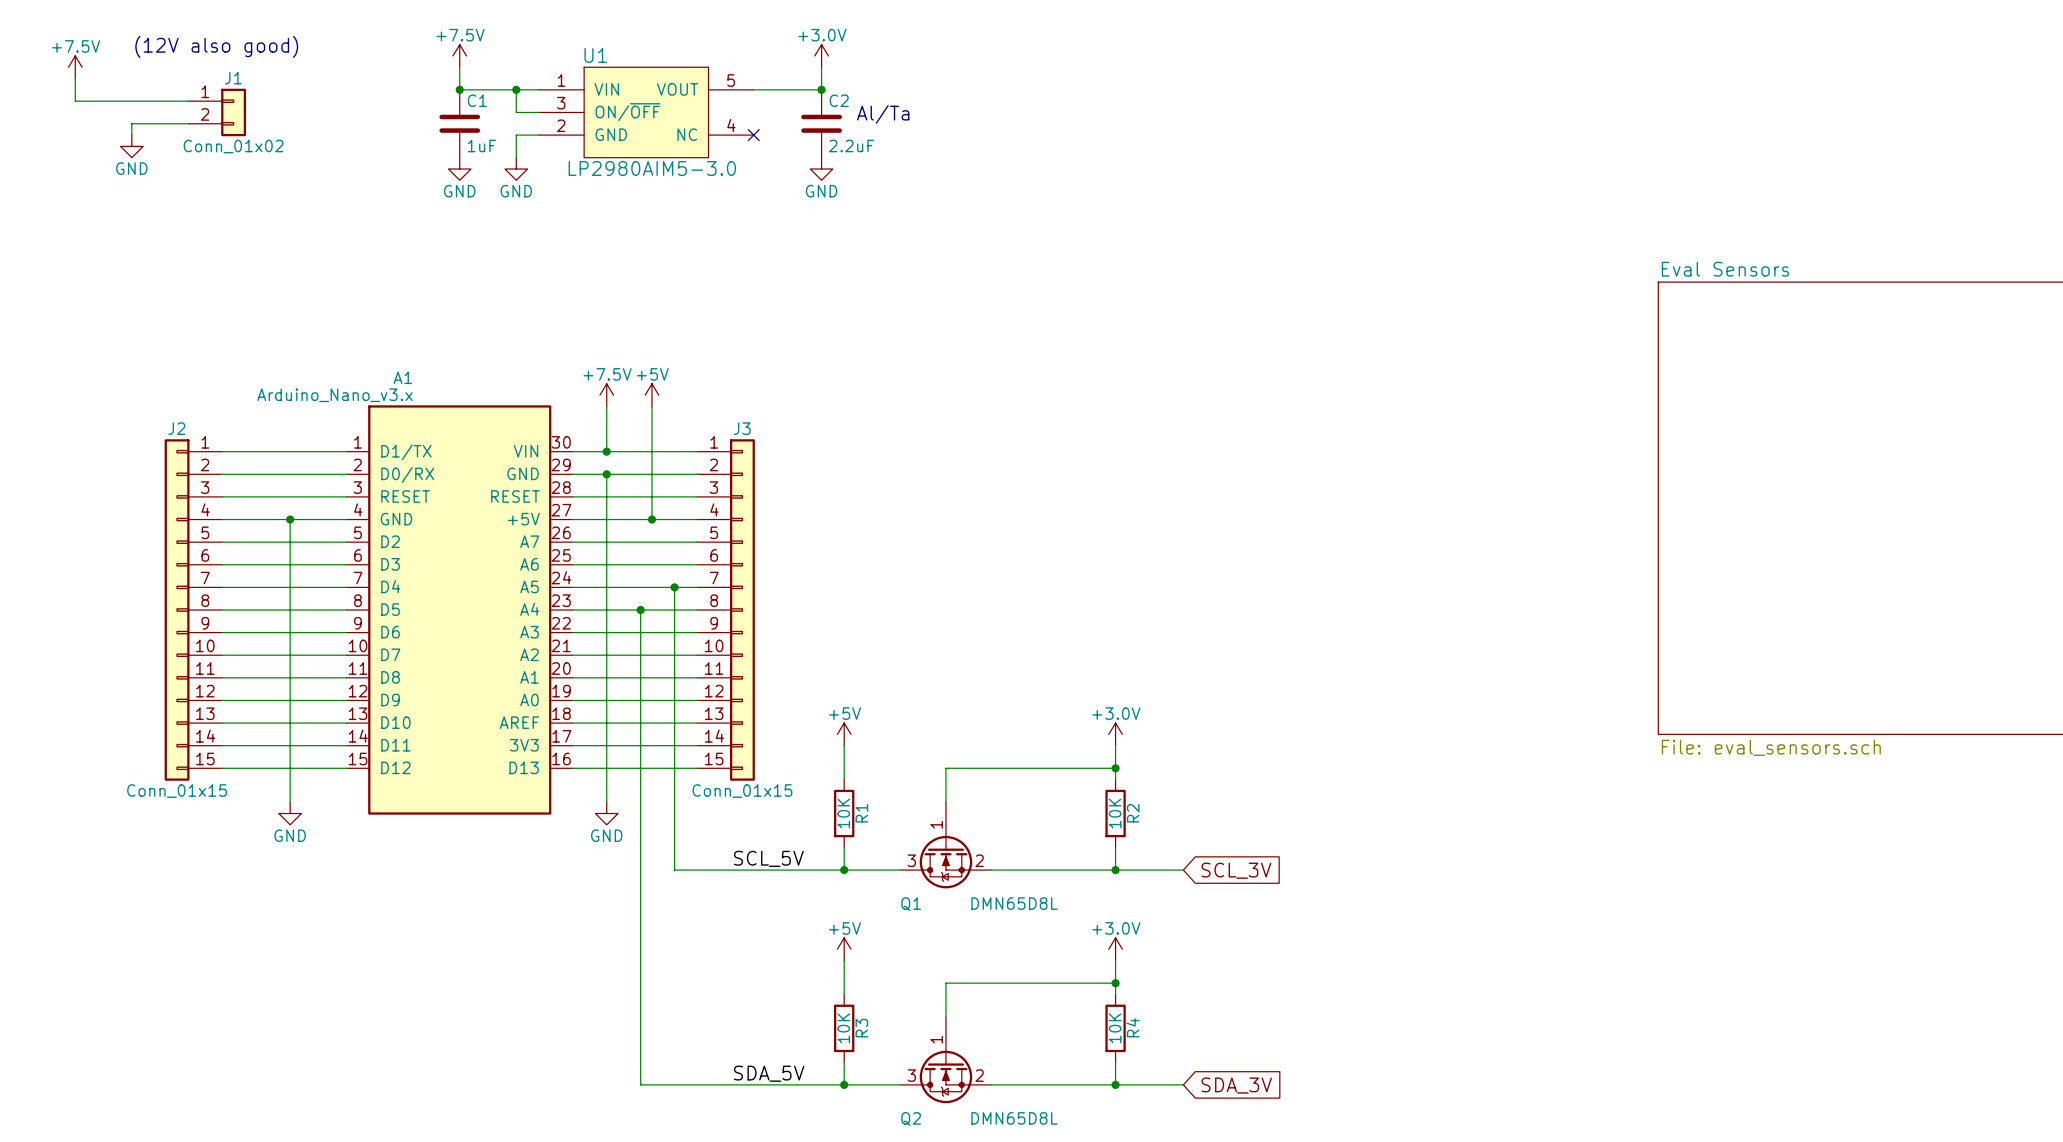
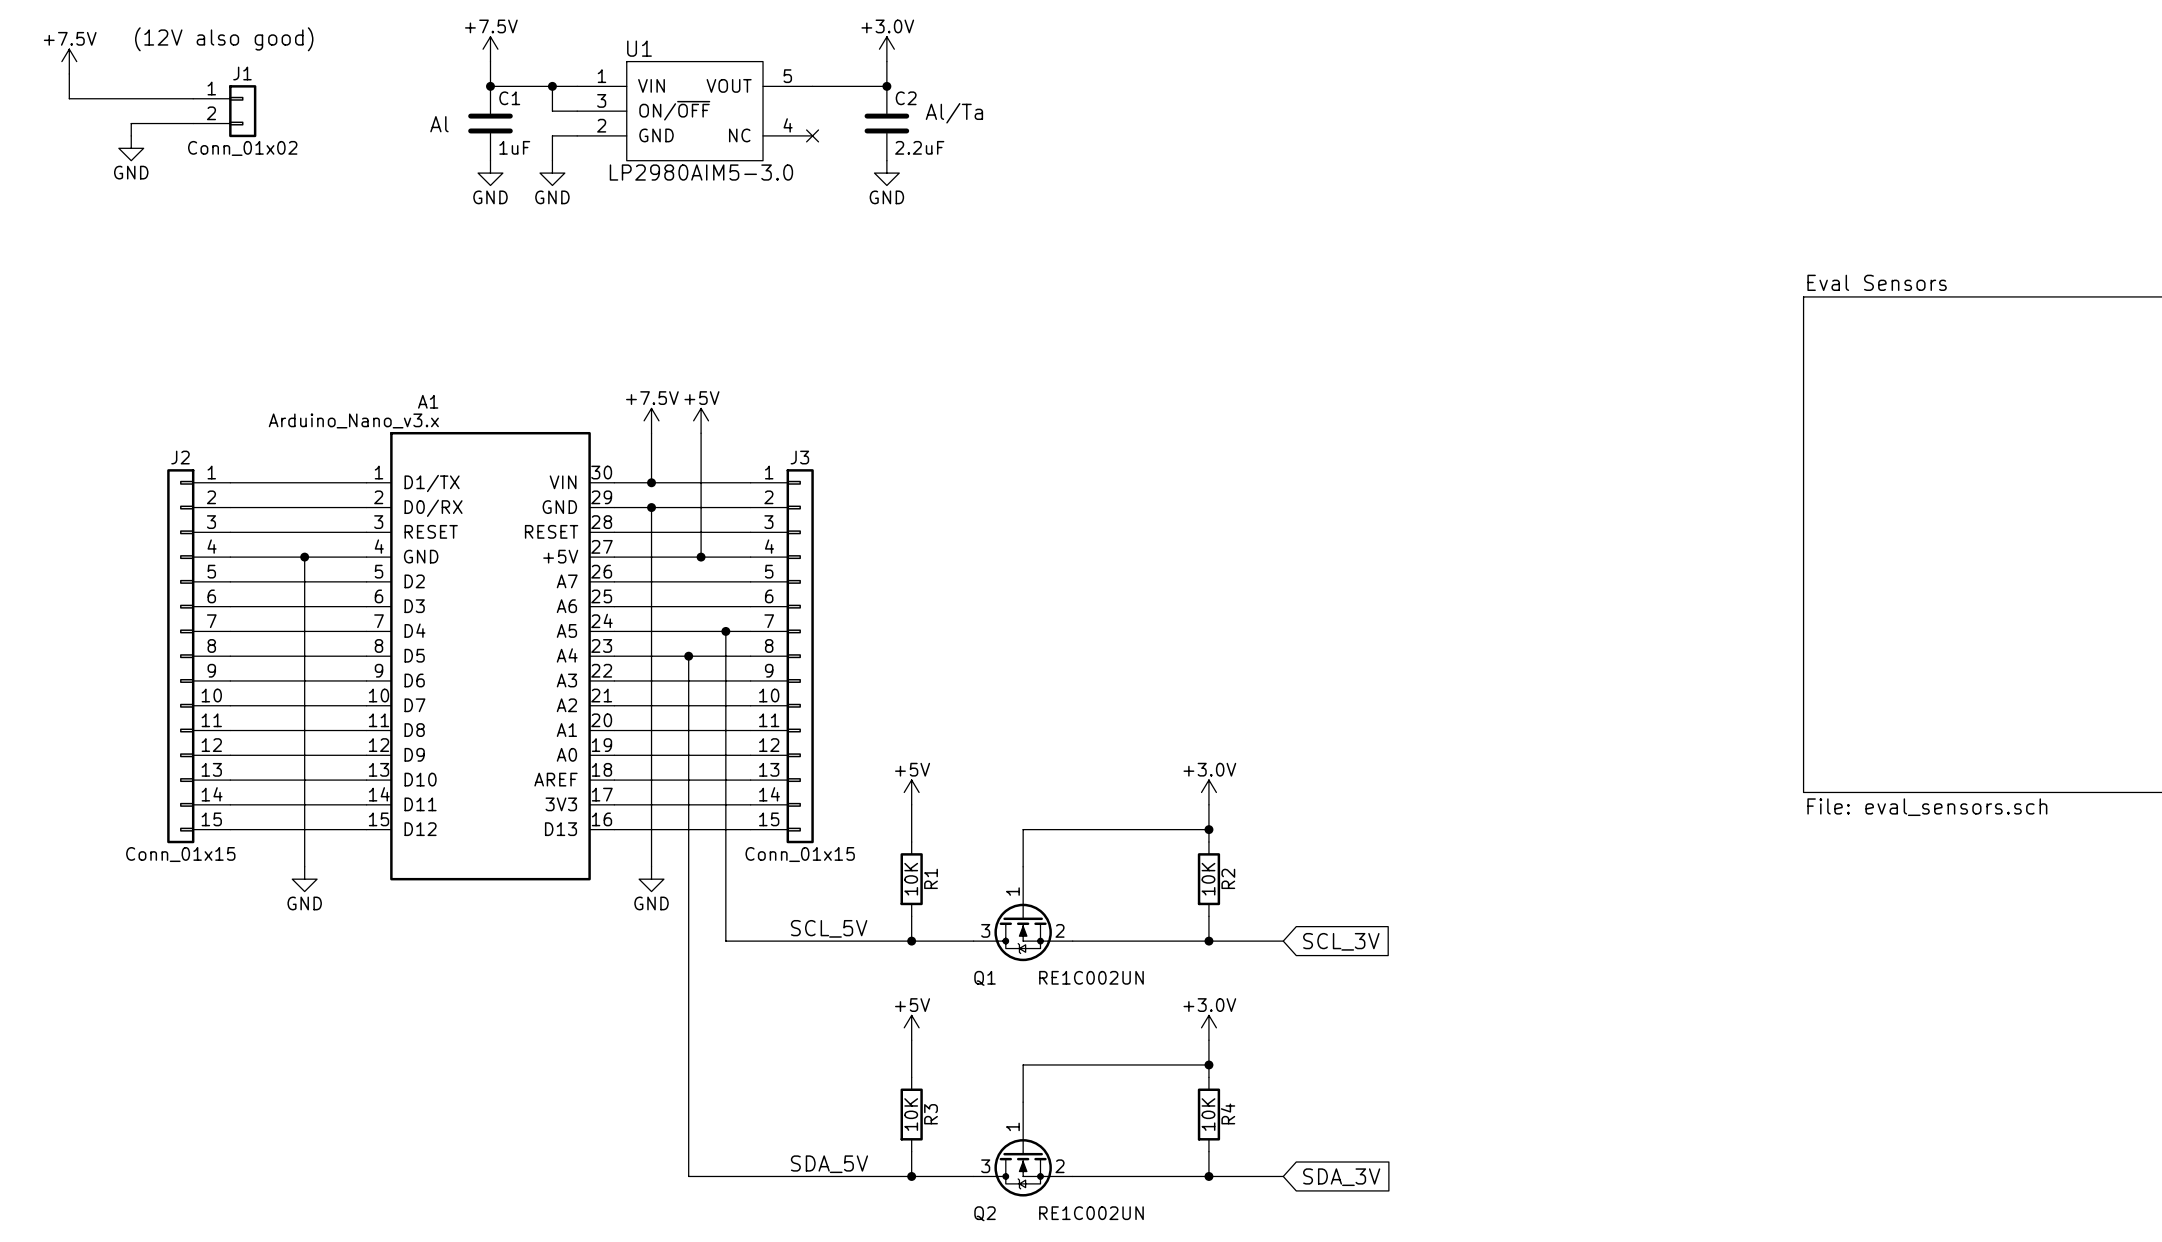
text: none -> Al (439, 124)
Q1 value: DMN65D8L (1014, 903) -> RE1C002UN (1091, 977)
Q2 value: DMN65D8L (1014, 1118) -> RE1C002UN (1091, 1213)

